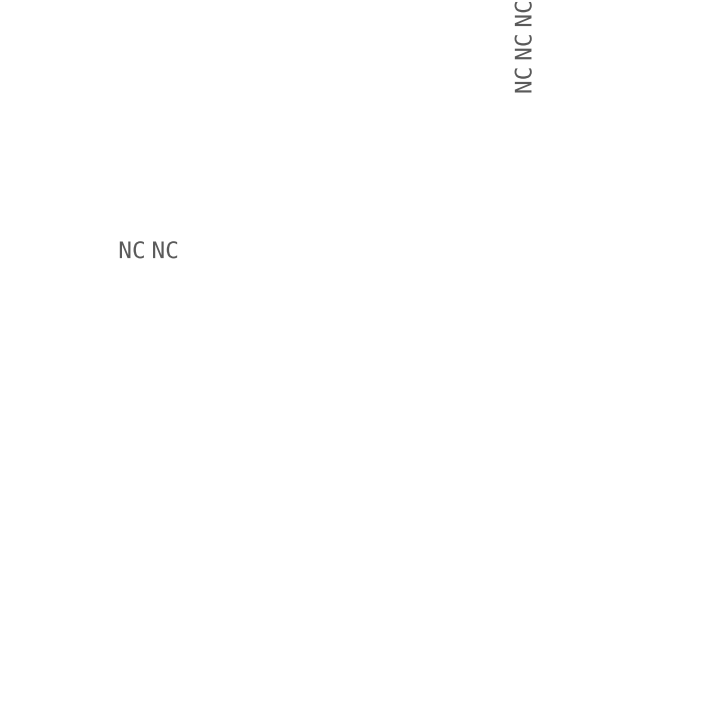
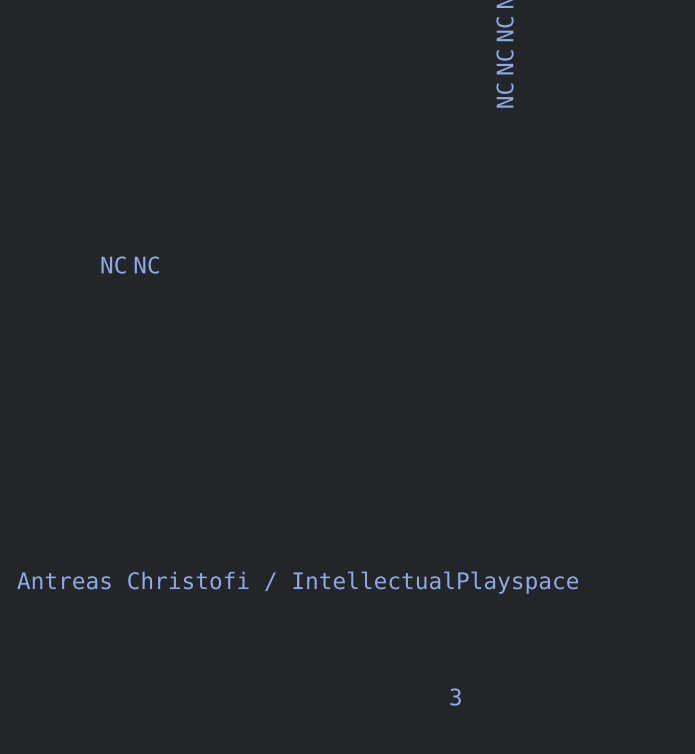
text: none -> Antreas Christofi / IntellectualPlayspace (297, 582)
text: none -> 3 (455, 697)

